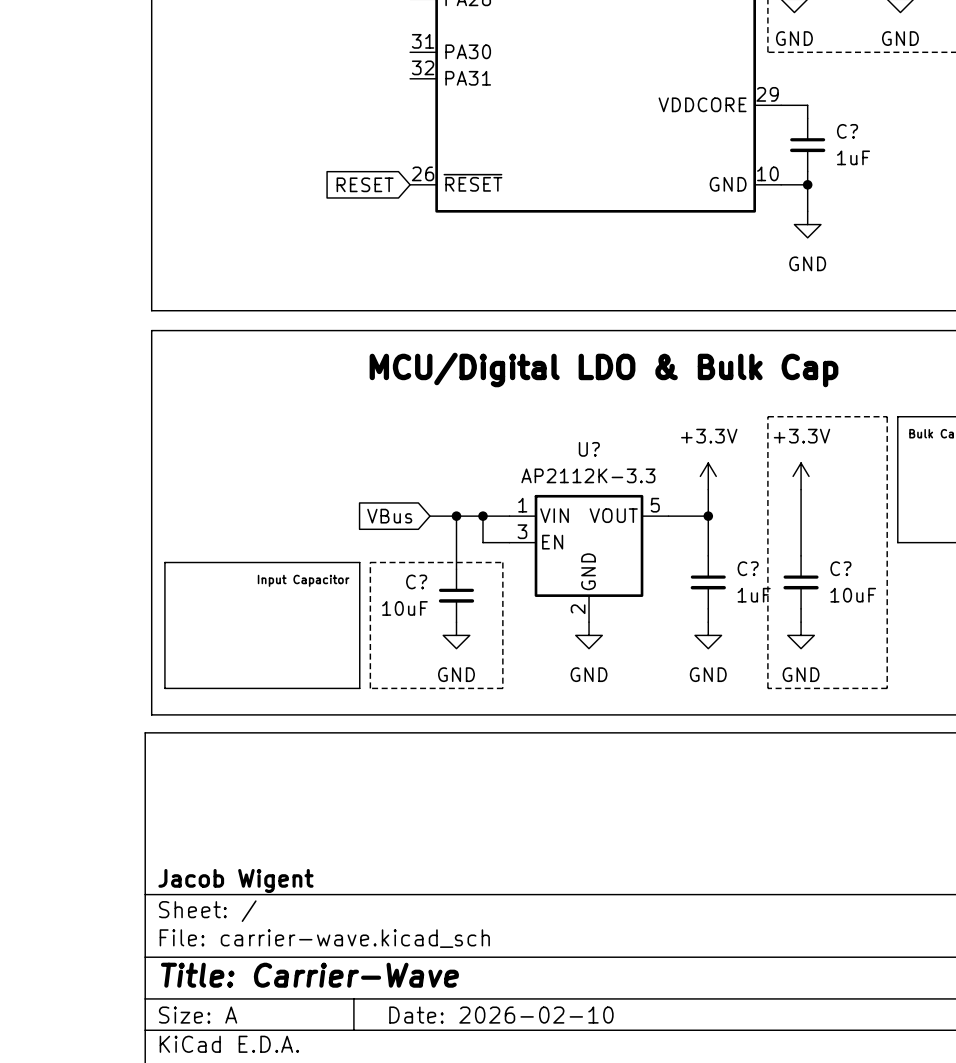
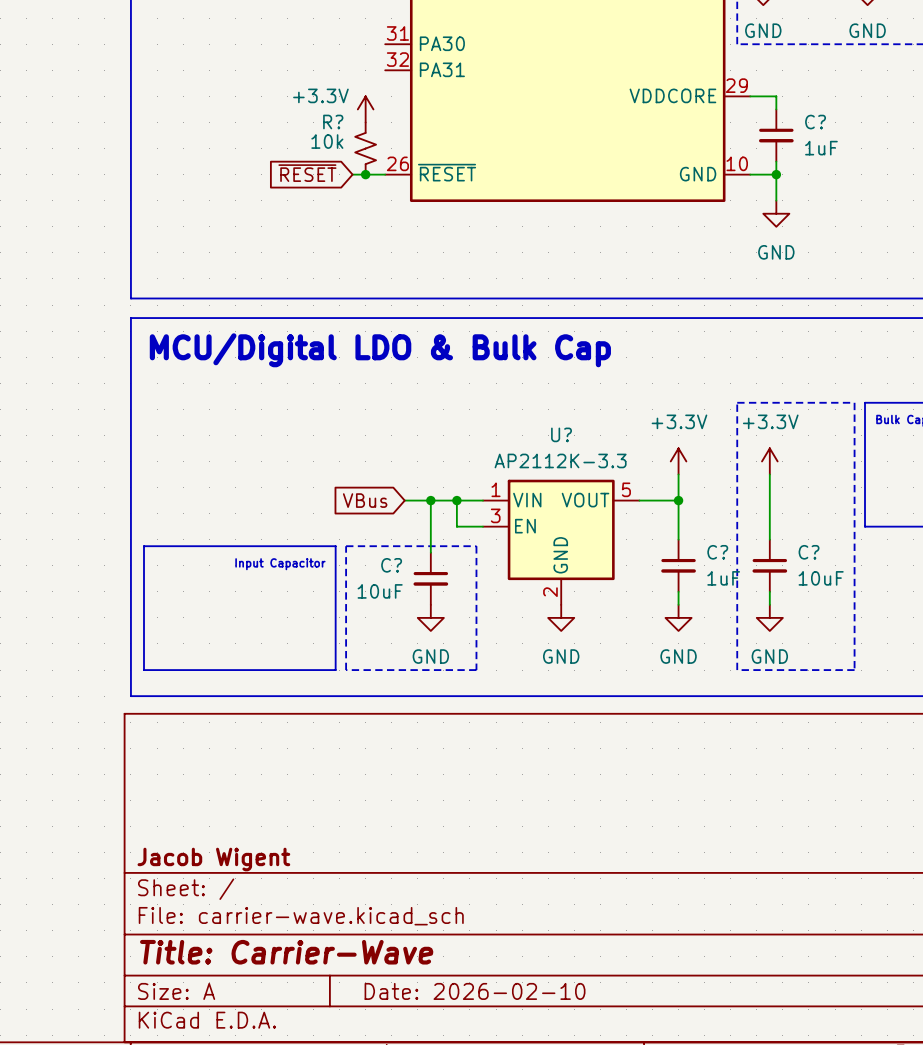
power symbol: none -> +3.3V (365, 109)
R?: none -> 10k (365, 148)
global label: RESET (365, 184) -> ~{RESET} (307, 173)
wire: none -> (352, 174) (385, 174)
junction: none -> (365, 174)
text position: MCU/Digital LDO & Bulk Cap (603, 369) -> MCU/Digital LDO & Bulk Cap (380, 350)

